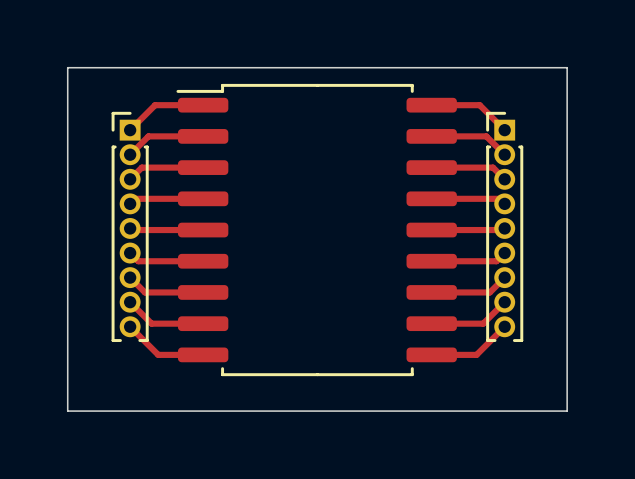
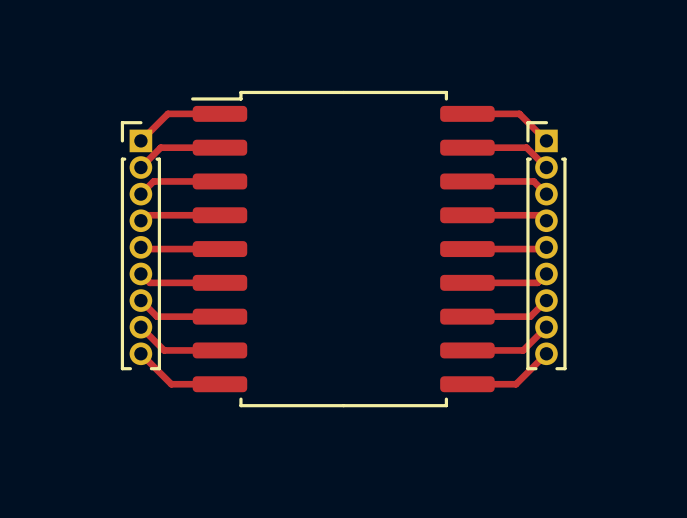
board edge: (67, 67) (567, 67) (567, 411) (67, 411) (67, 67) -> none

